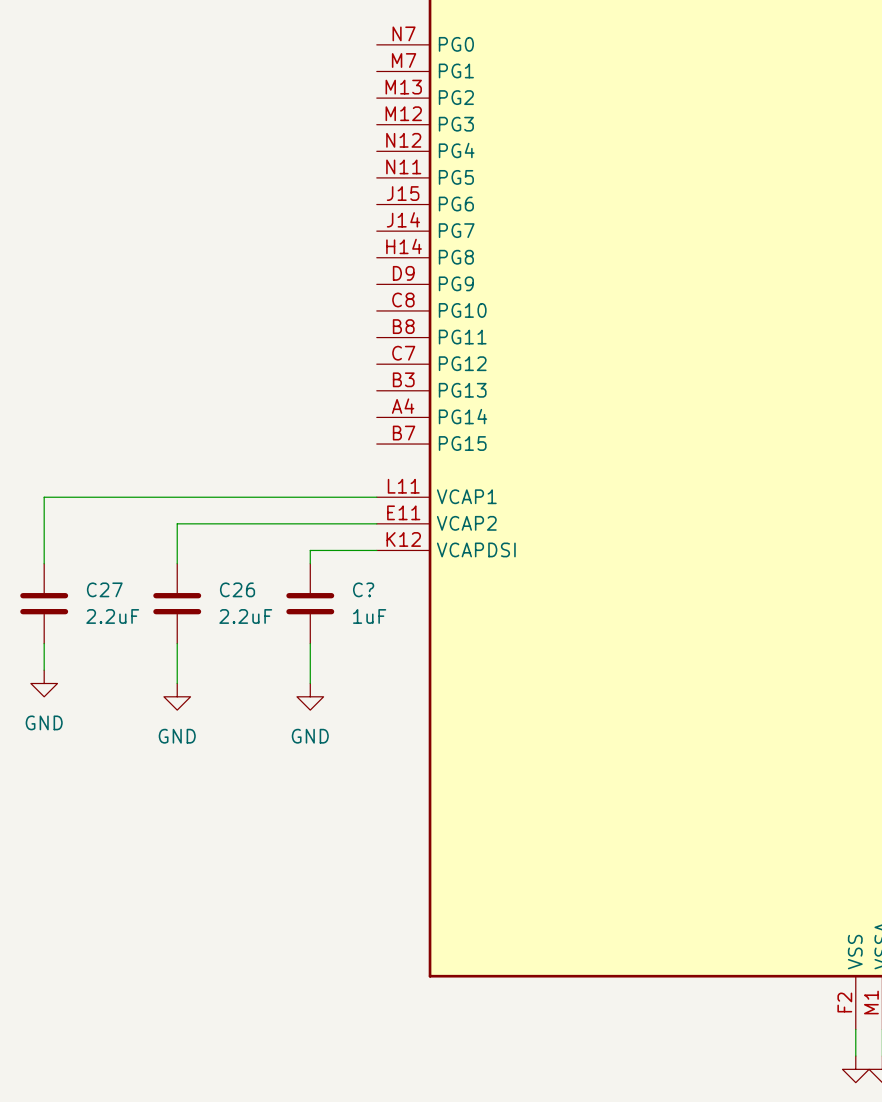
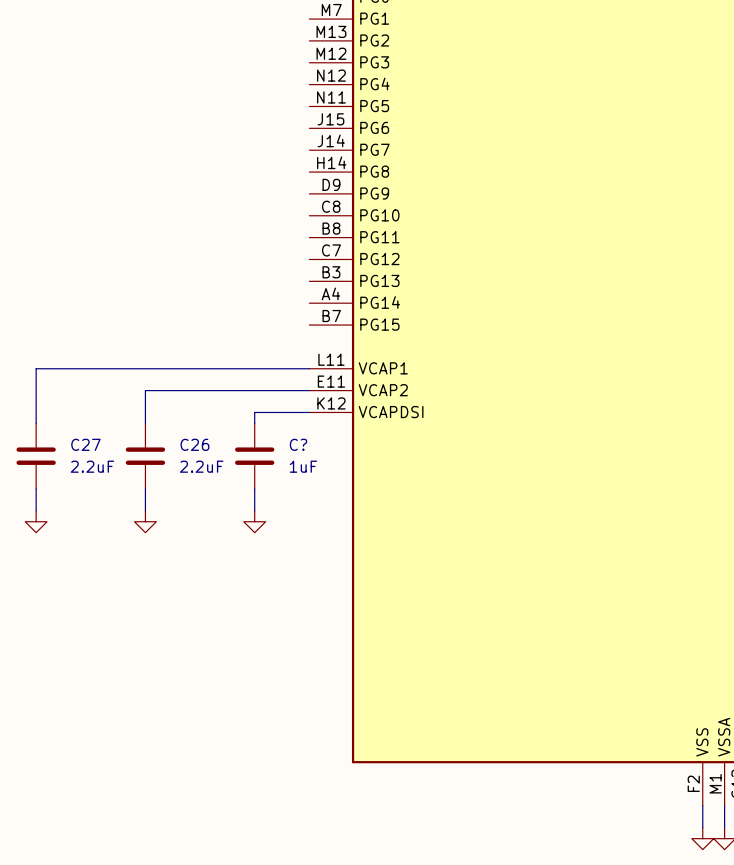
power symbol: none -> (145, 521)
power symbol: none -> (254, 521)
power symbol: GND (177, 696) -> none
power symbol: GND (310, 696) -> none
power symbol text: GND (44, 722) -> none

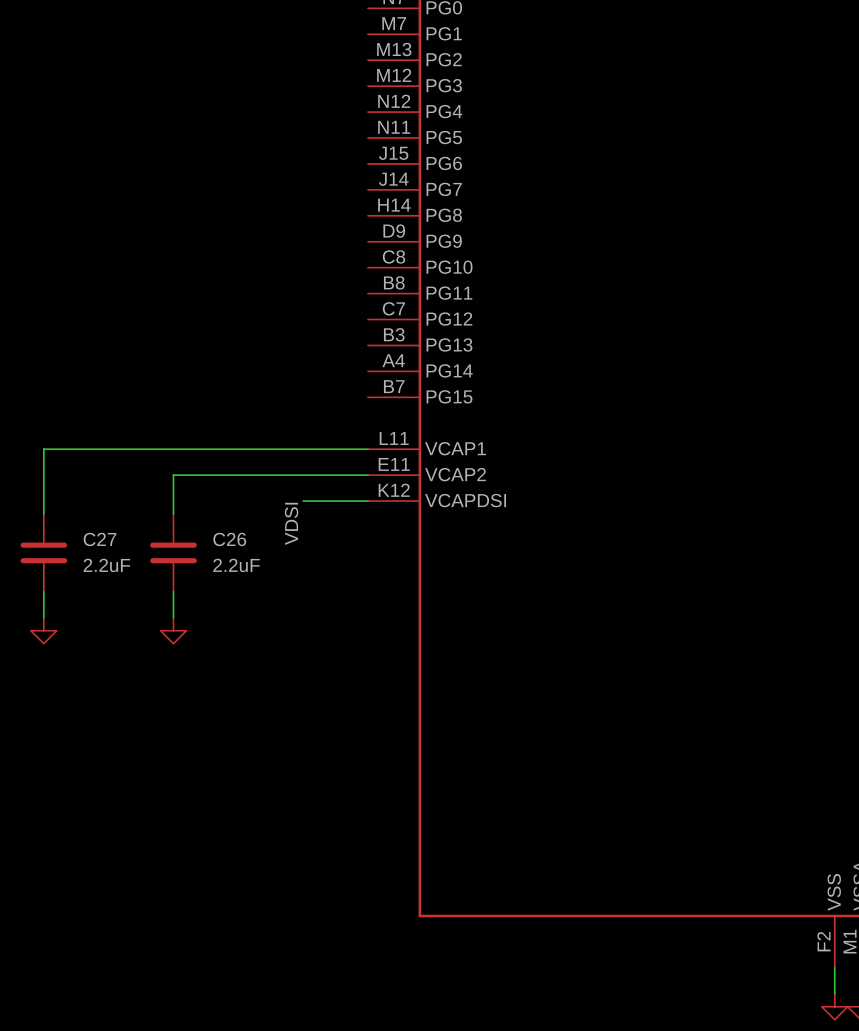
wire: (254, 412) (254, 423) -> none
label: none -> VDSI (291, 523)
C?: 1uF (254, 456) -> none
wire: (254, 488) (254, 510) -> none
power symbol: (254, 521) -> none

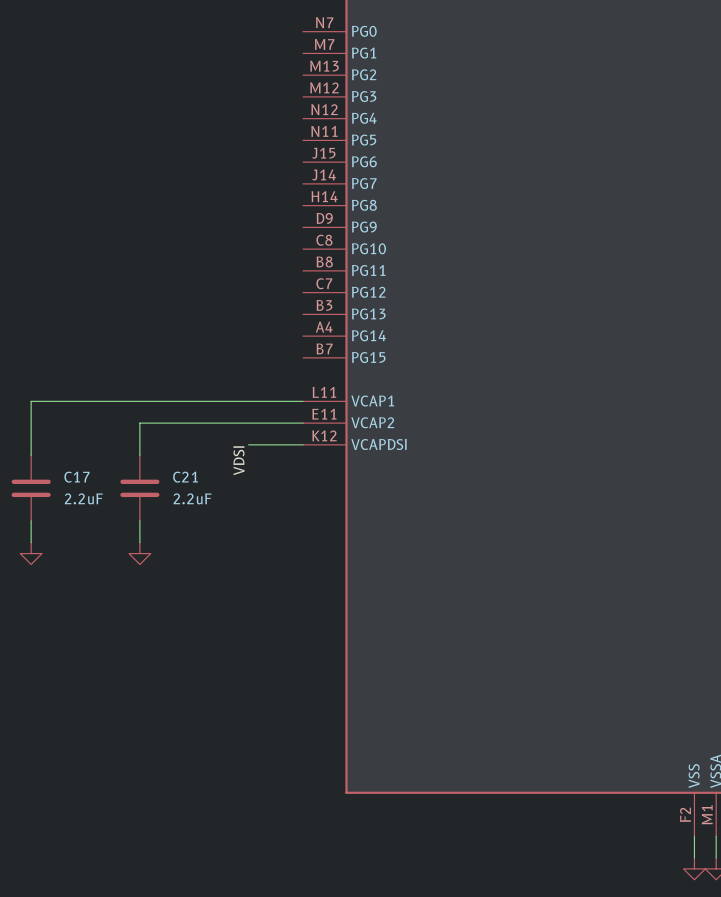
C27 name: C27 (100, 539) -> C17 (76, 477)
C26 name: C26 (229, 539) -> C21 (185, 477)

